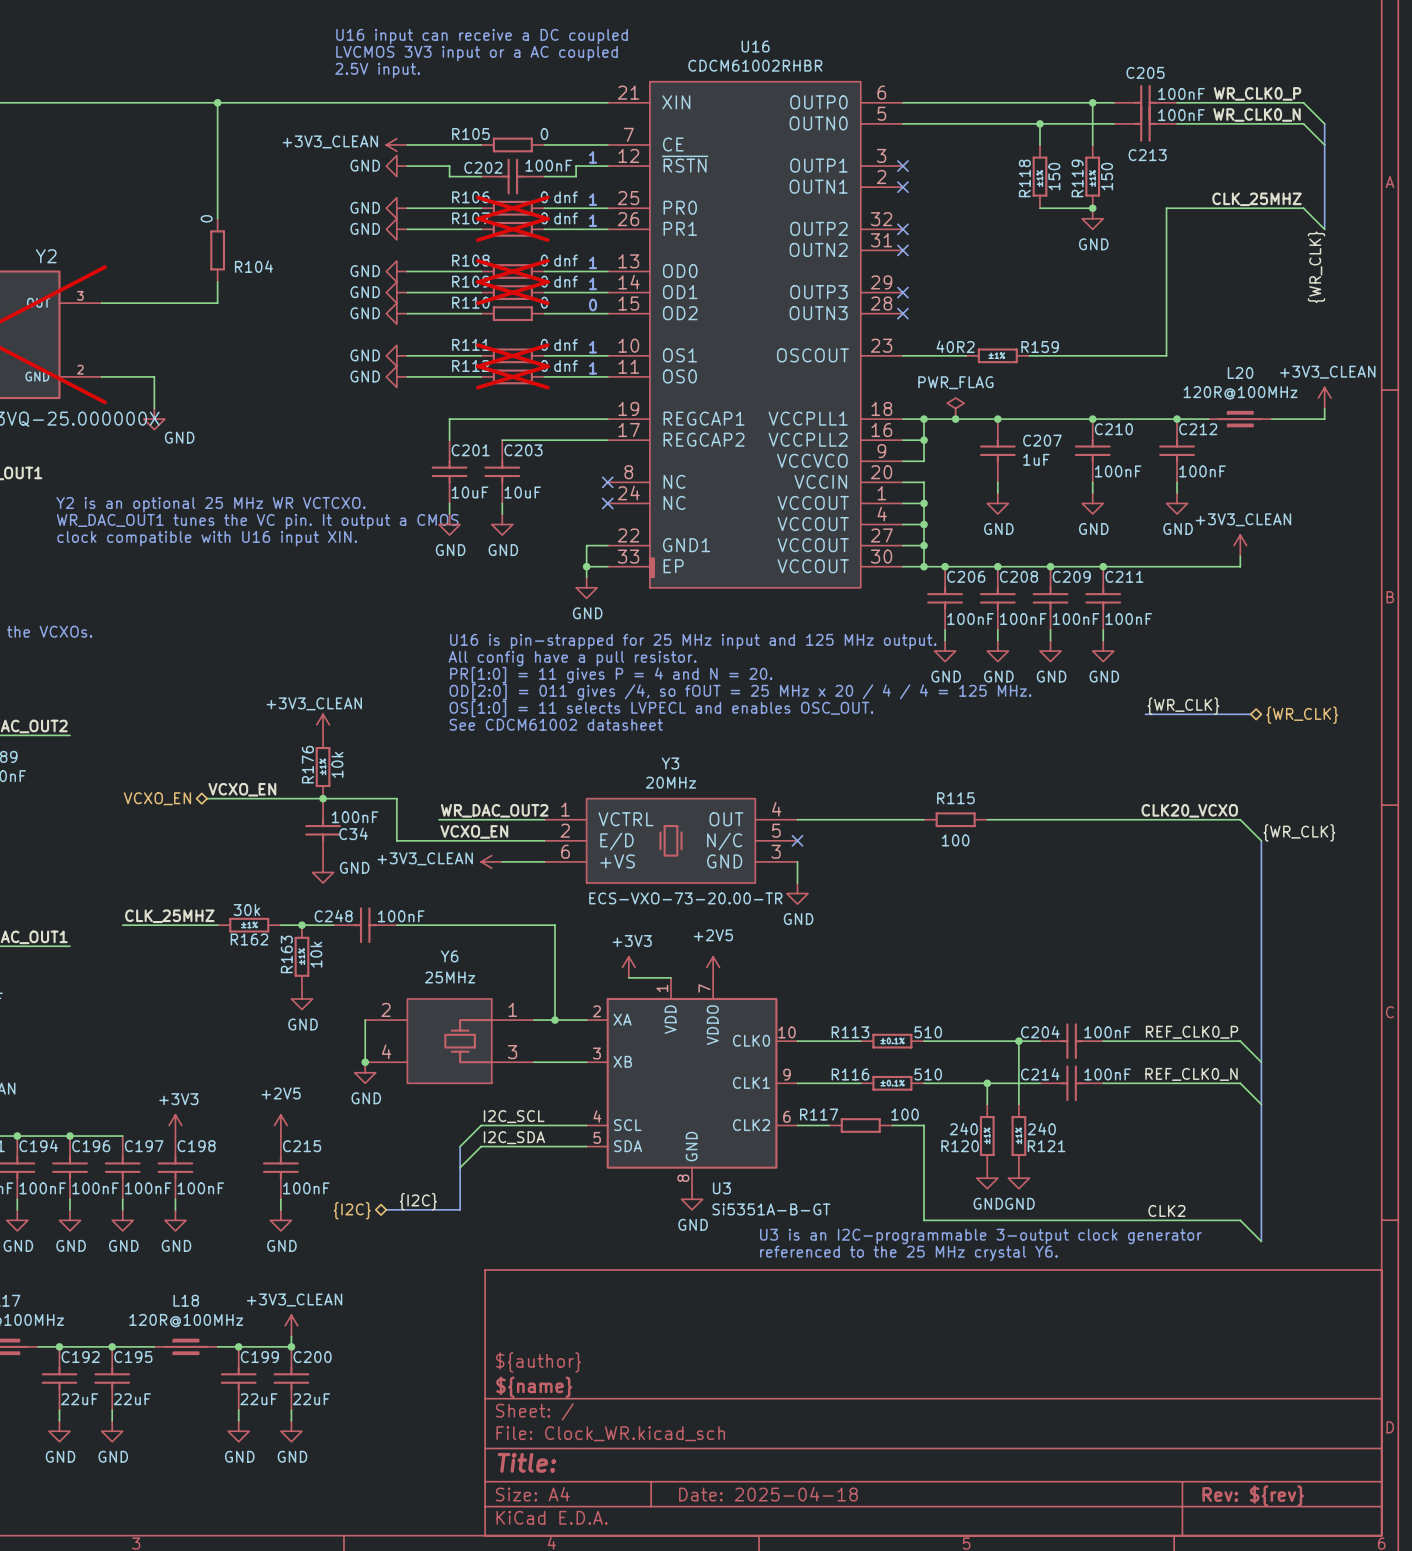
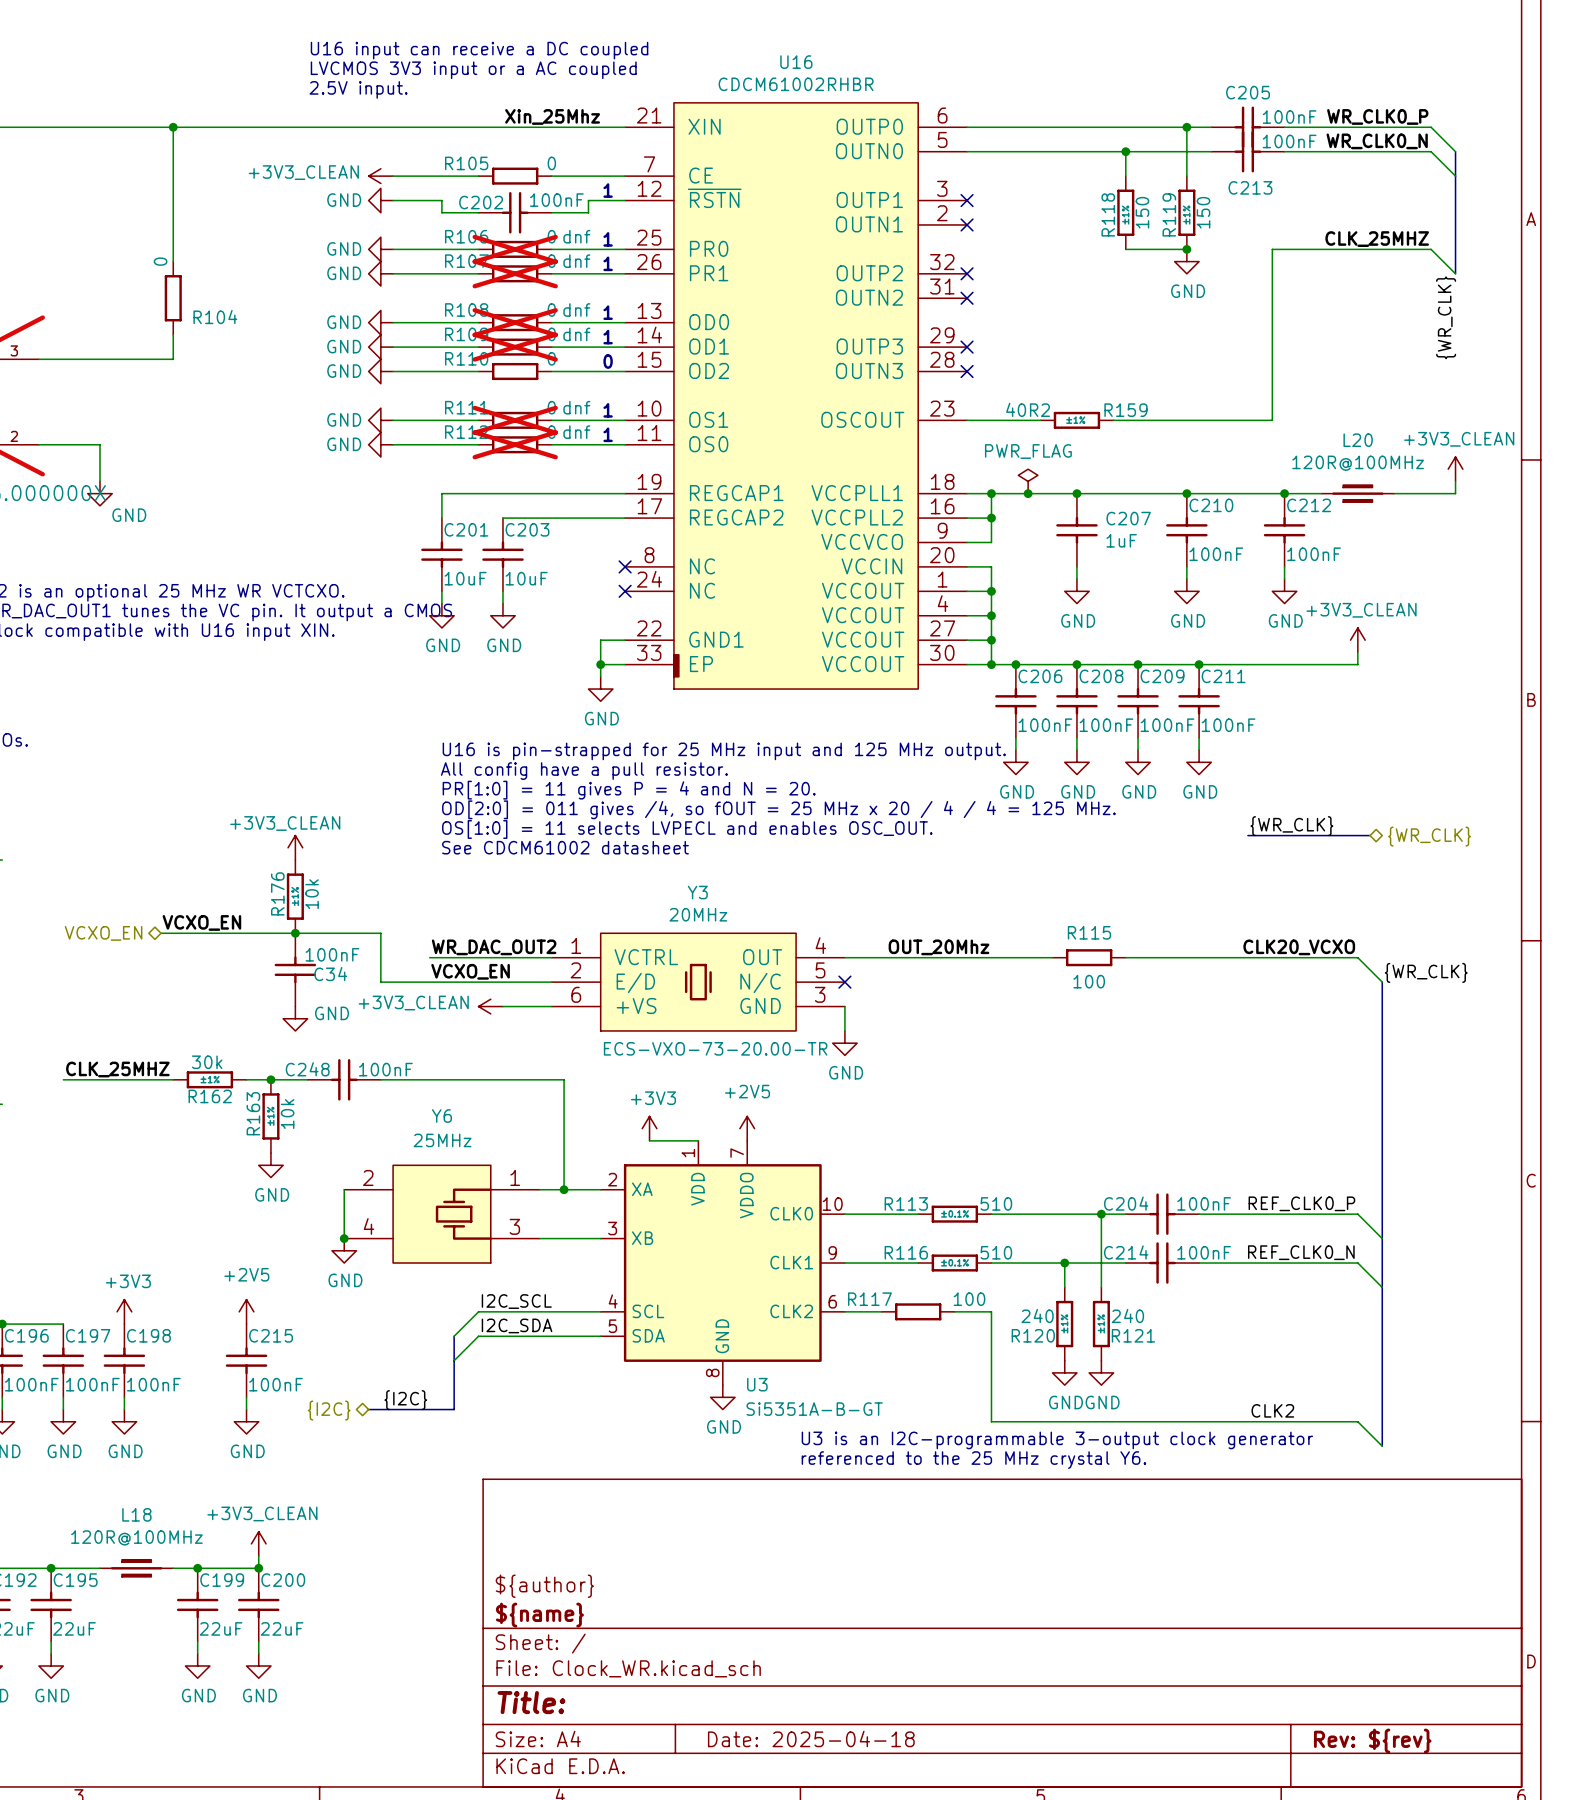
label: none -> Xin_25Mhz (552, 116)
label: none -> OUT_20Mhz (938, 947)
R115 position: (955, 819) -> (1089, 957)
wire: (987, 819) (1039, 819) -> (991, 957) (1052, 957)

